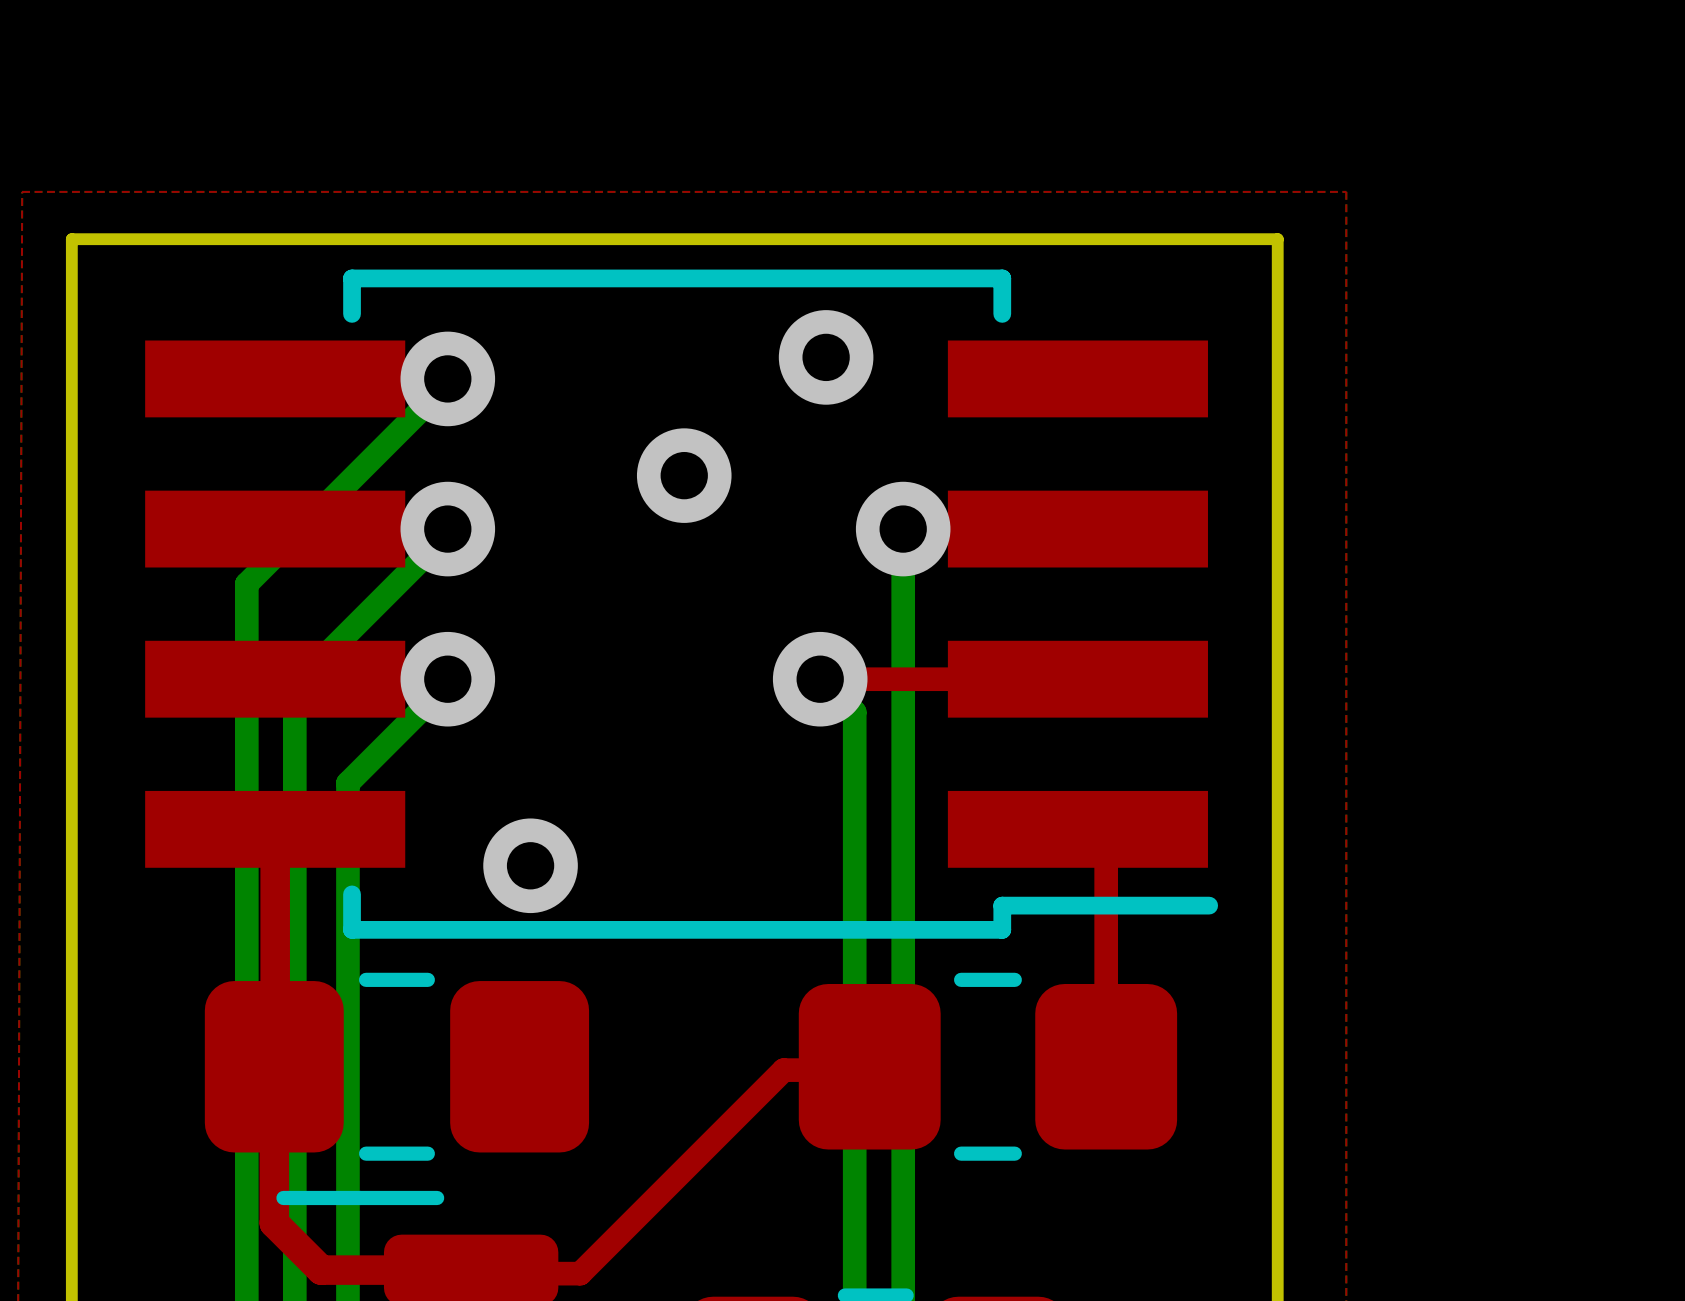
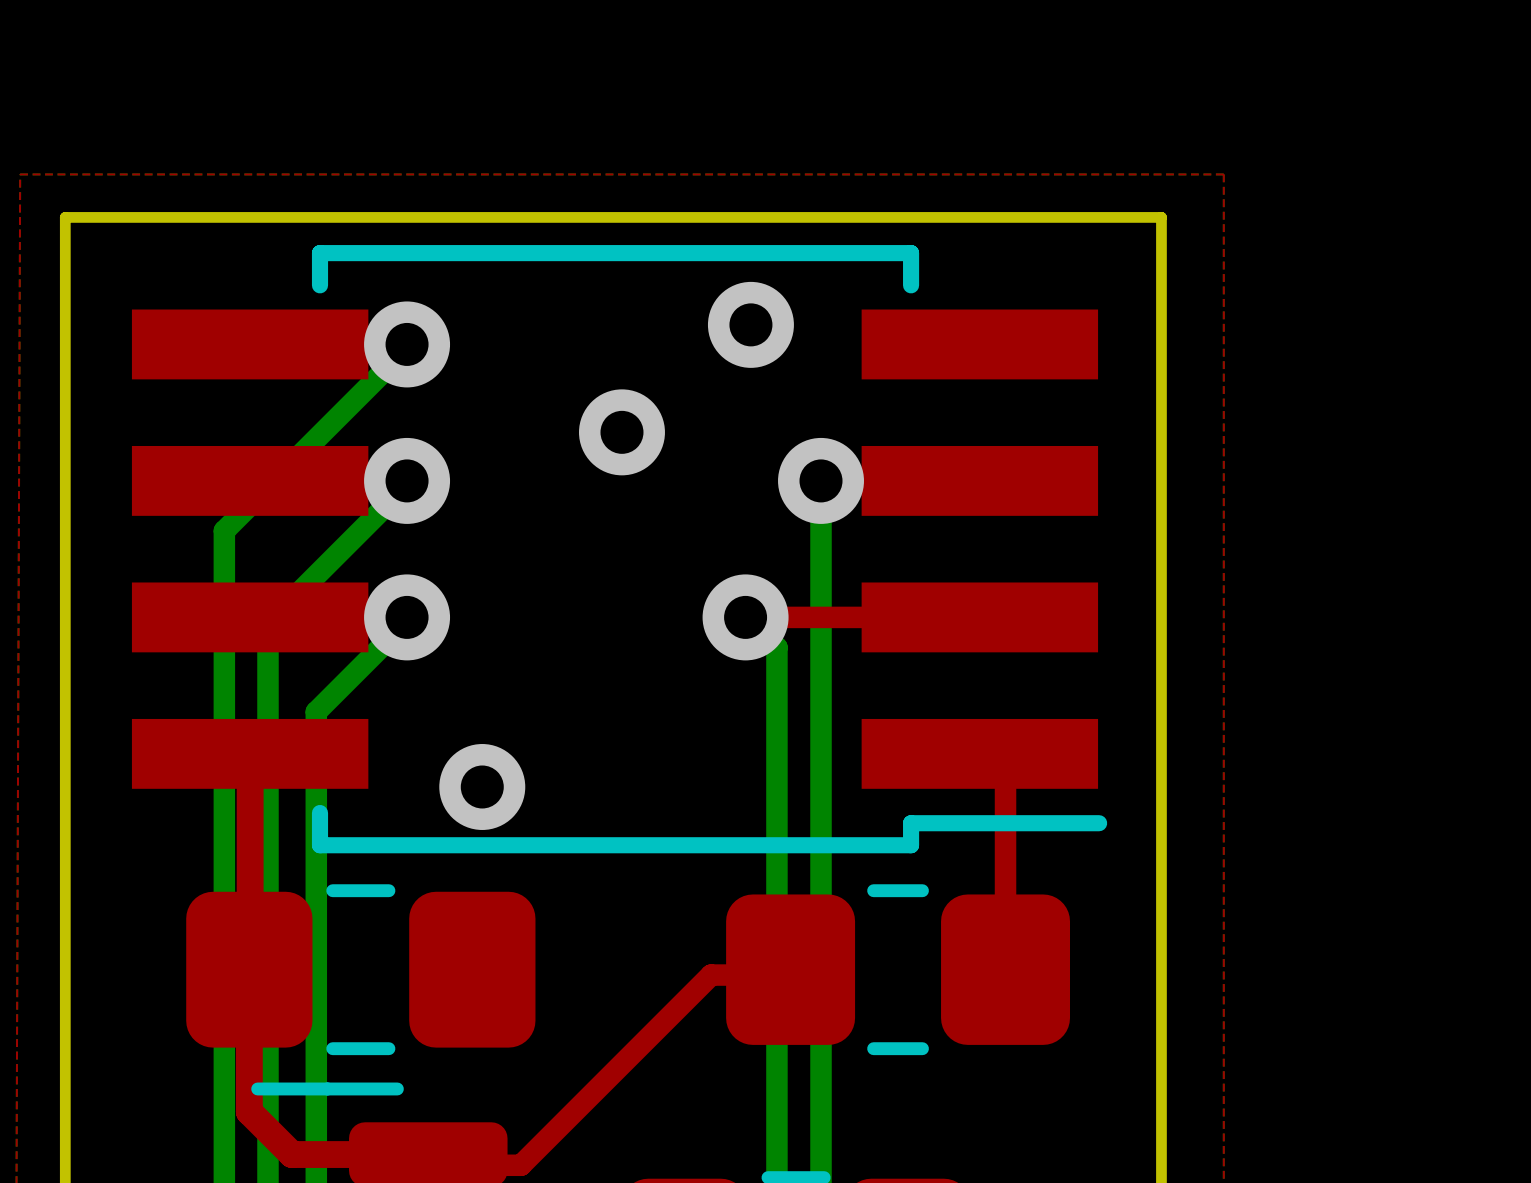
top track: (869, 1070) (783, 1070) (580, 1273) (534, 1273) -> (790, 975) (711, 975) (520, 1165) (428, 1165)

